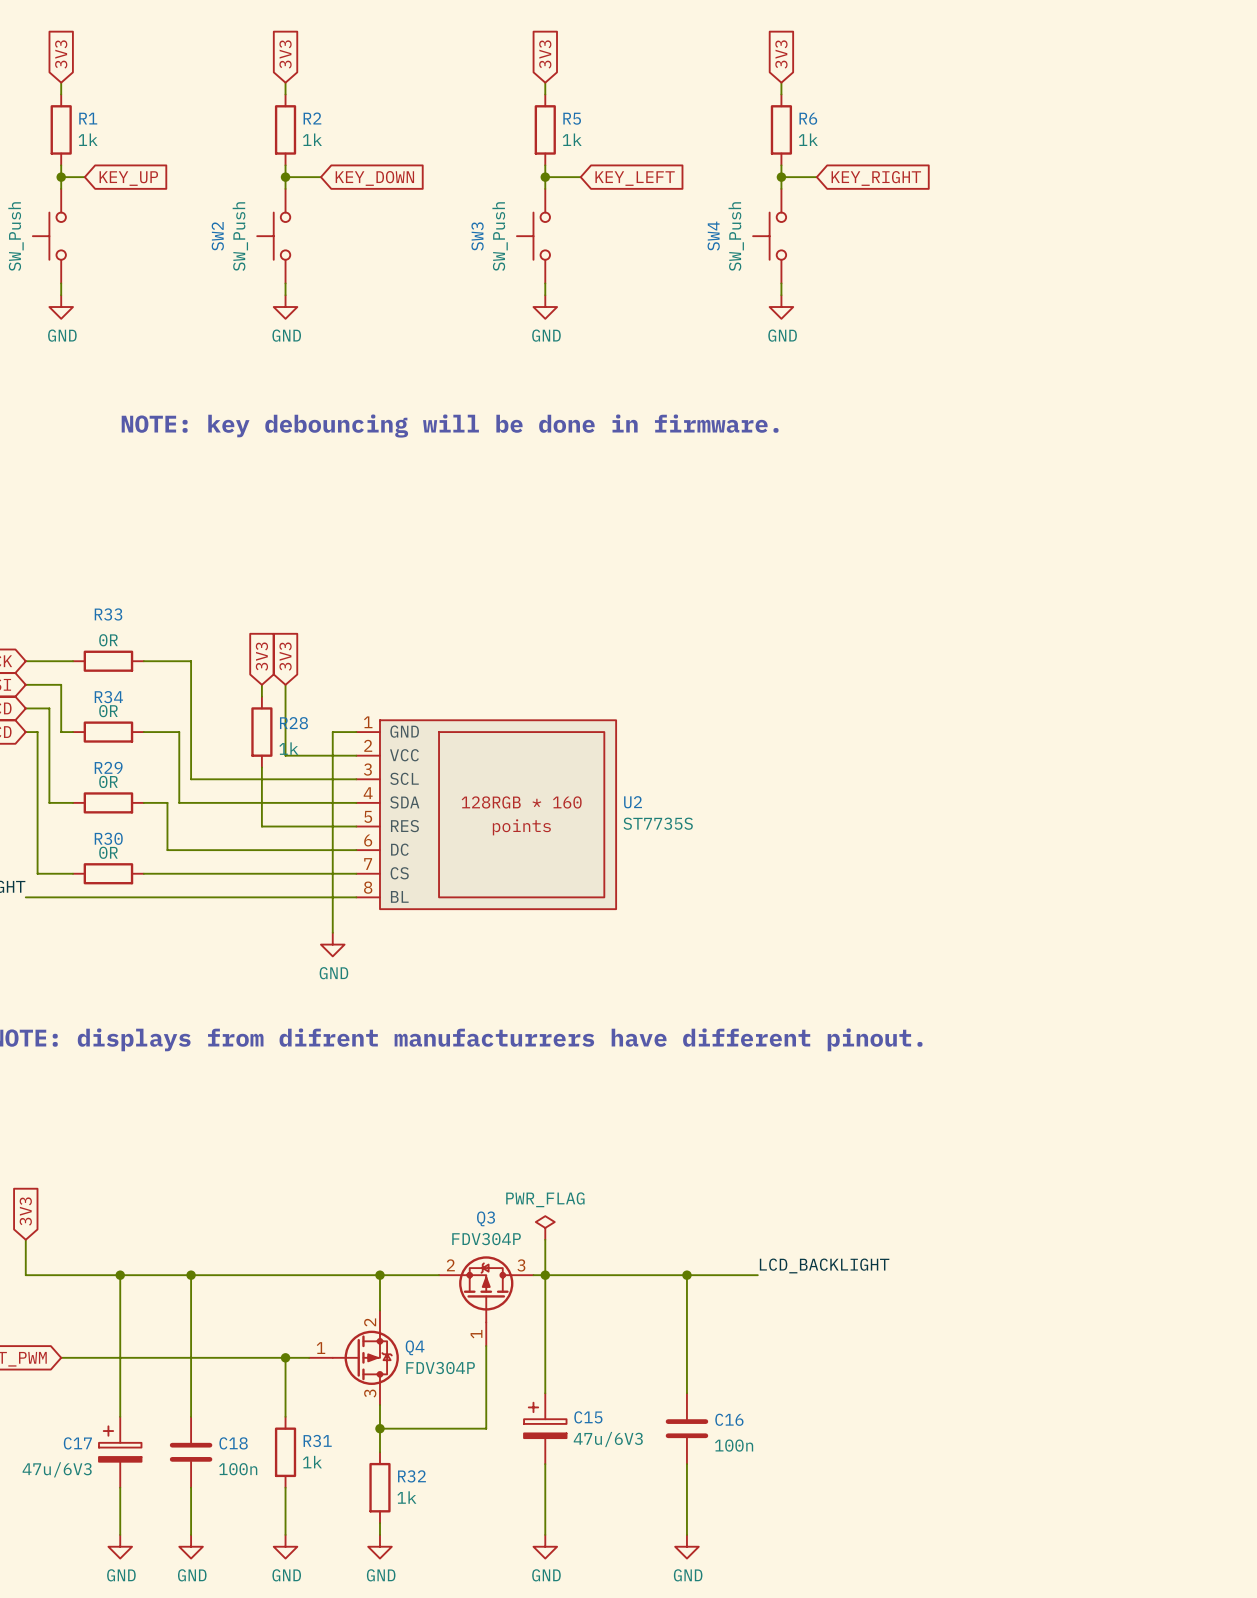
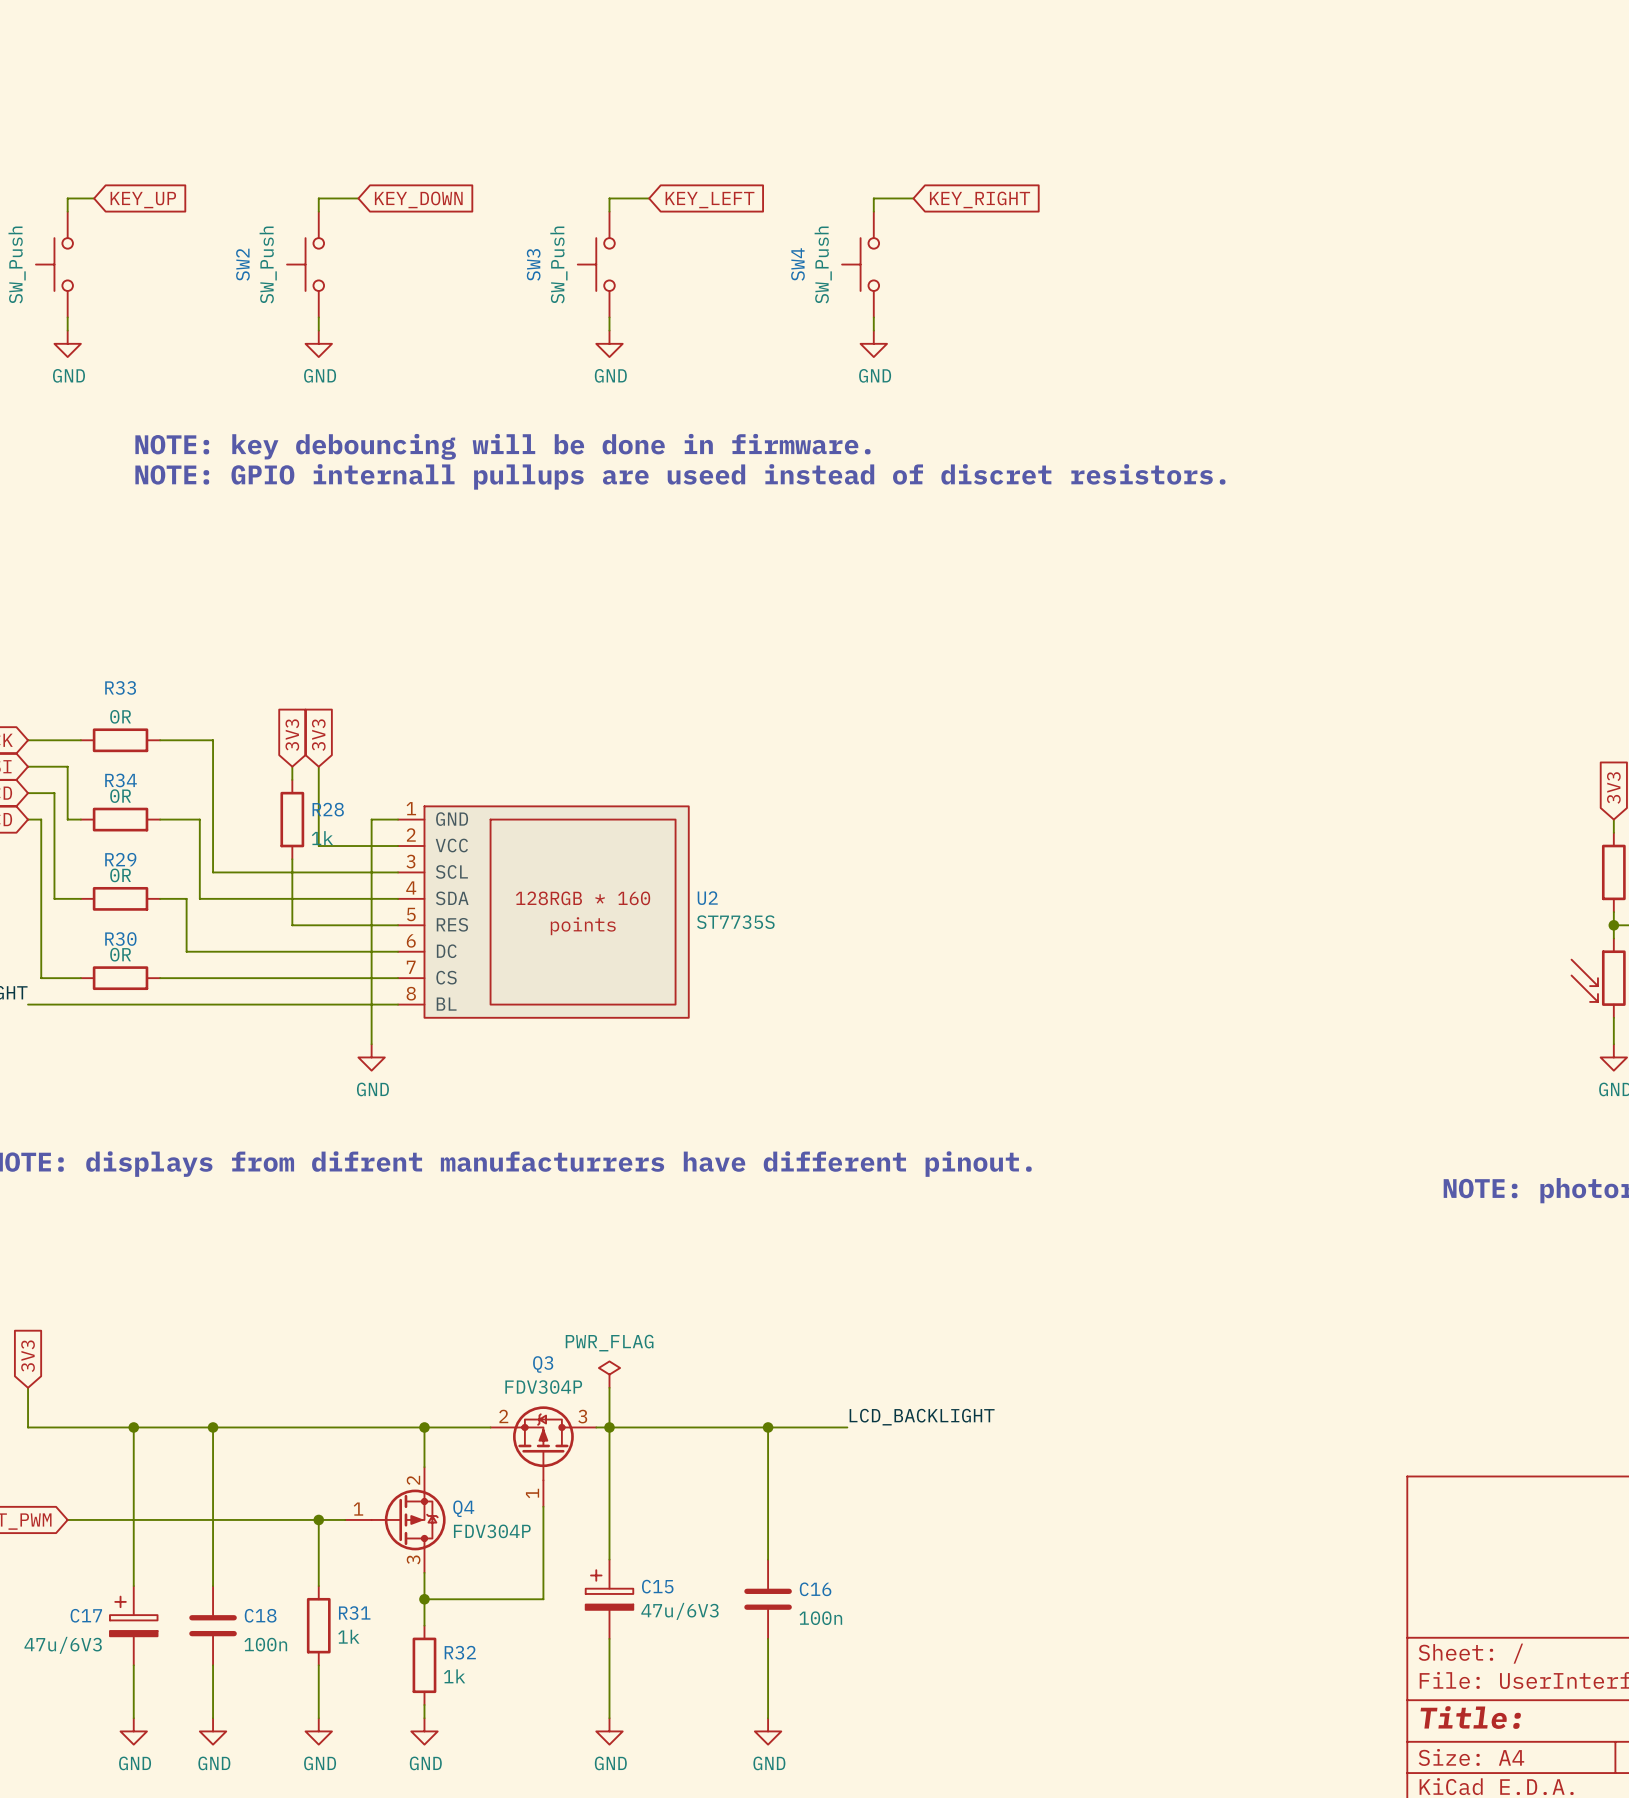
global label: 3V3 (61, 54) -> none
global label: 3V3 (285, 54) -> none
global label: 3V3 (545, 54) -> none
global label: 3V3 (781, 54) -> none
wire: (61, 82) (61, 94) -> none
wire: (285, 82) (285, 94) -> none
wire: (545, 82) (545, 94) -> none
wire: (781, 82) (781, 94) -> none
R1: 1k (61, 129) -> none
R2: 1k (285, 129) -> none
R5: 1k (545, 129) -> none
R6: 1k (781, 129) -> none
wire: (61, 165) (61, 177) -> none
wire: (285, 165) (285, 177) -> none
wire: (545, 165) (545, 177) -> none
wire: (781, 165) (781, 177) -> none
junction: (61, 177) -> none
junction: (285, 177) -> none
junction: (545, 177) -> none
junction: (781, 177) -> none
text: none -> NOTE: key debouncing will be done in firmware. (502, 446)
text: NOTE: key debouncing will be done in firmware. (450, 426) -> NOTE: GPIO internall pullups are useed instead of discret resistors. (680, 476)

